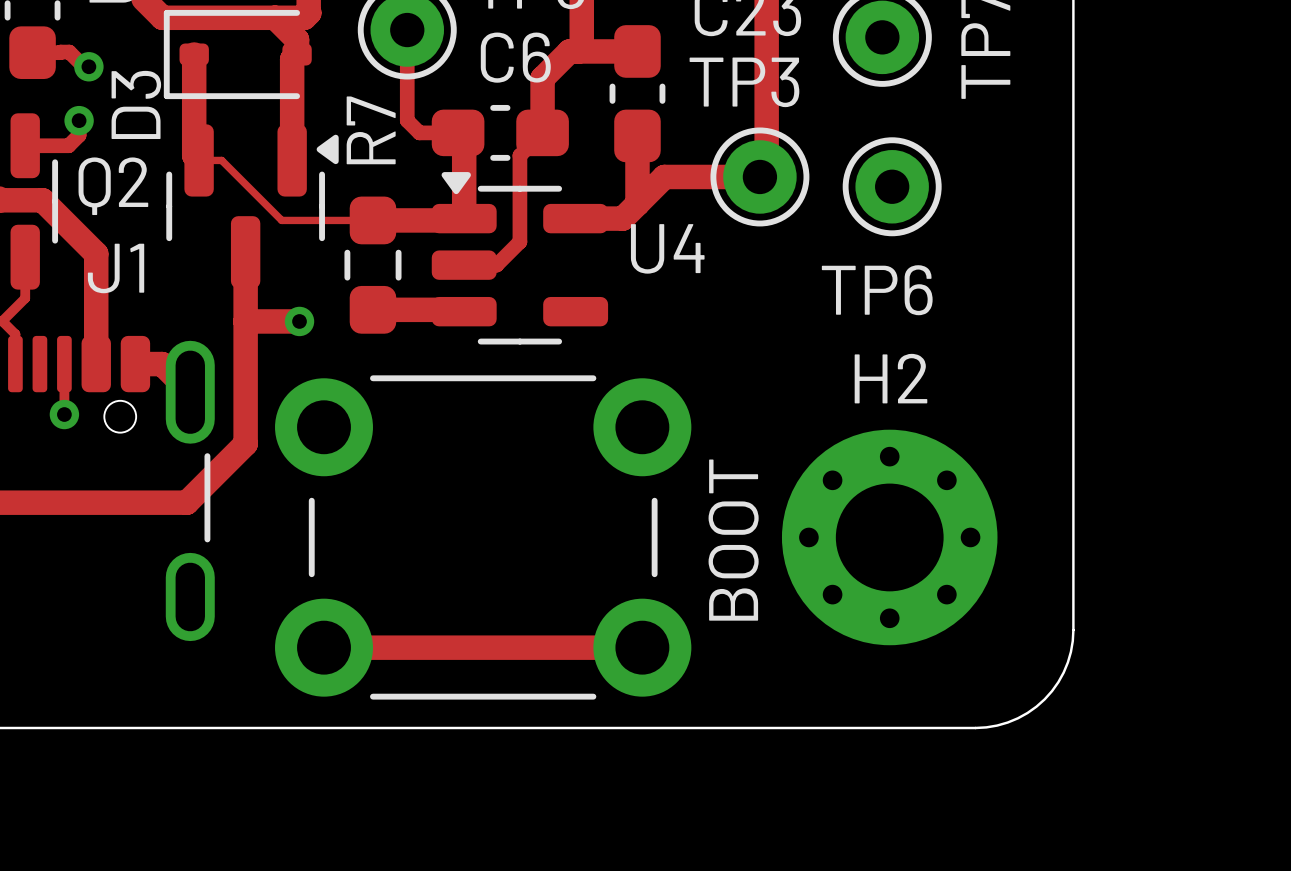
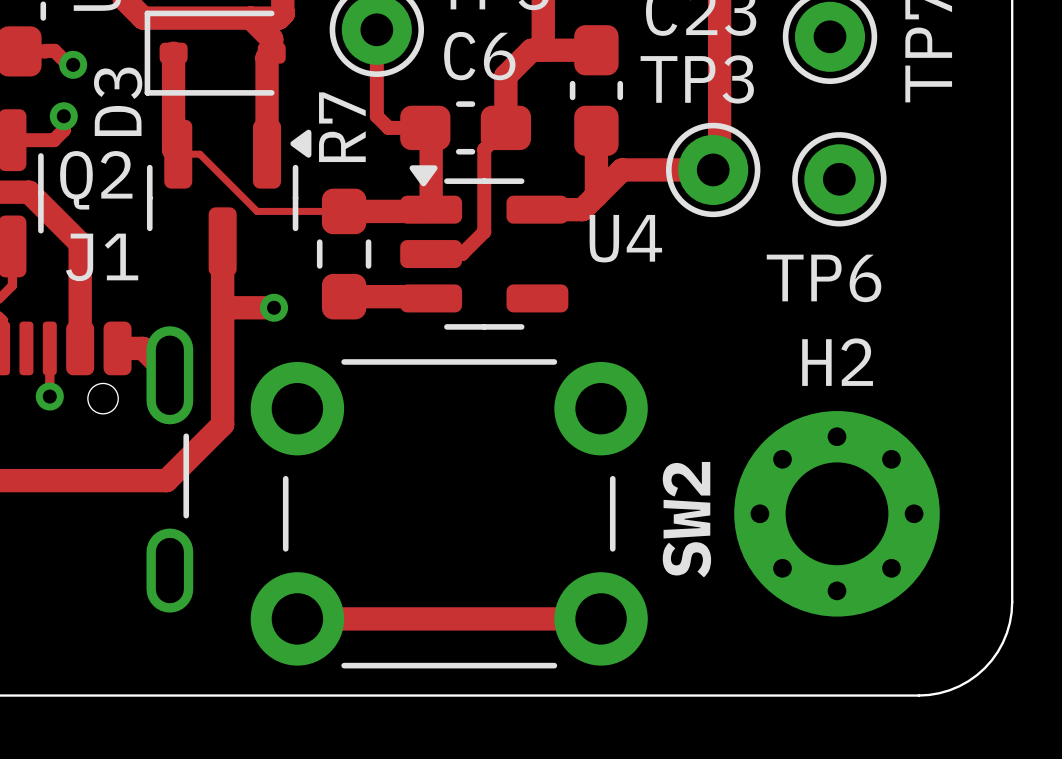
BOOT name: BOOT (733, 540) -> SW2 (686, 519)

